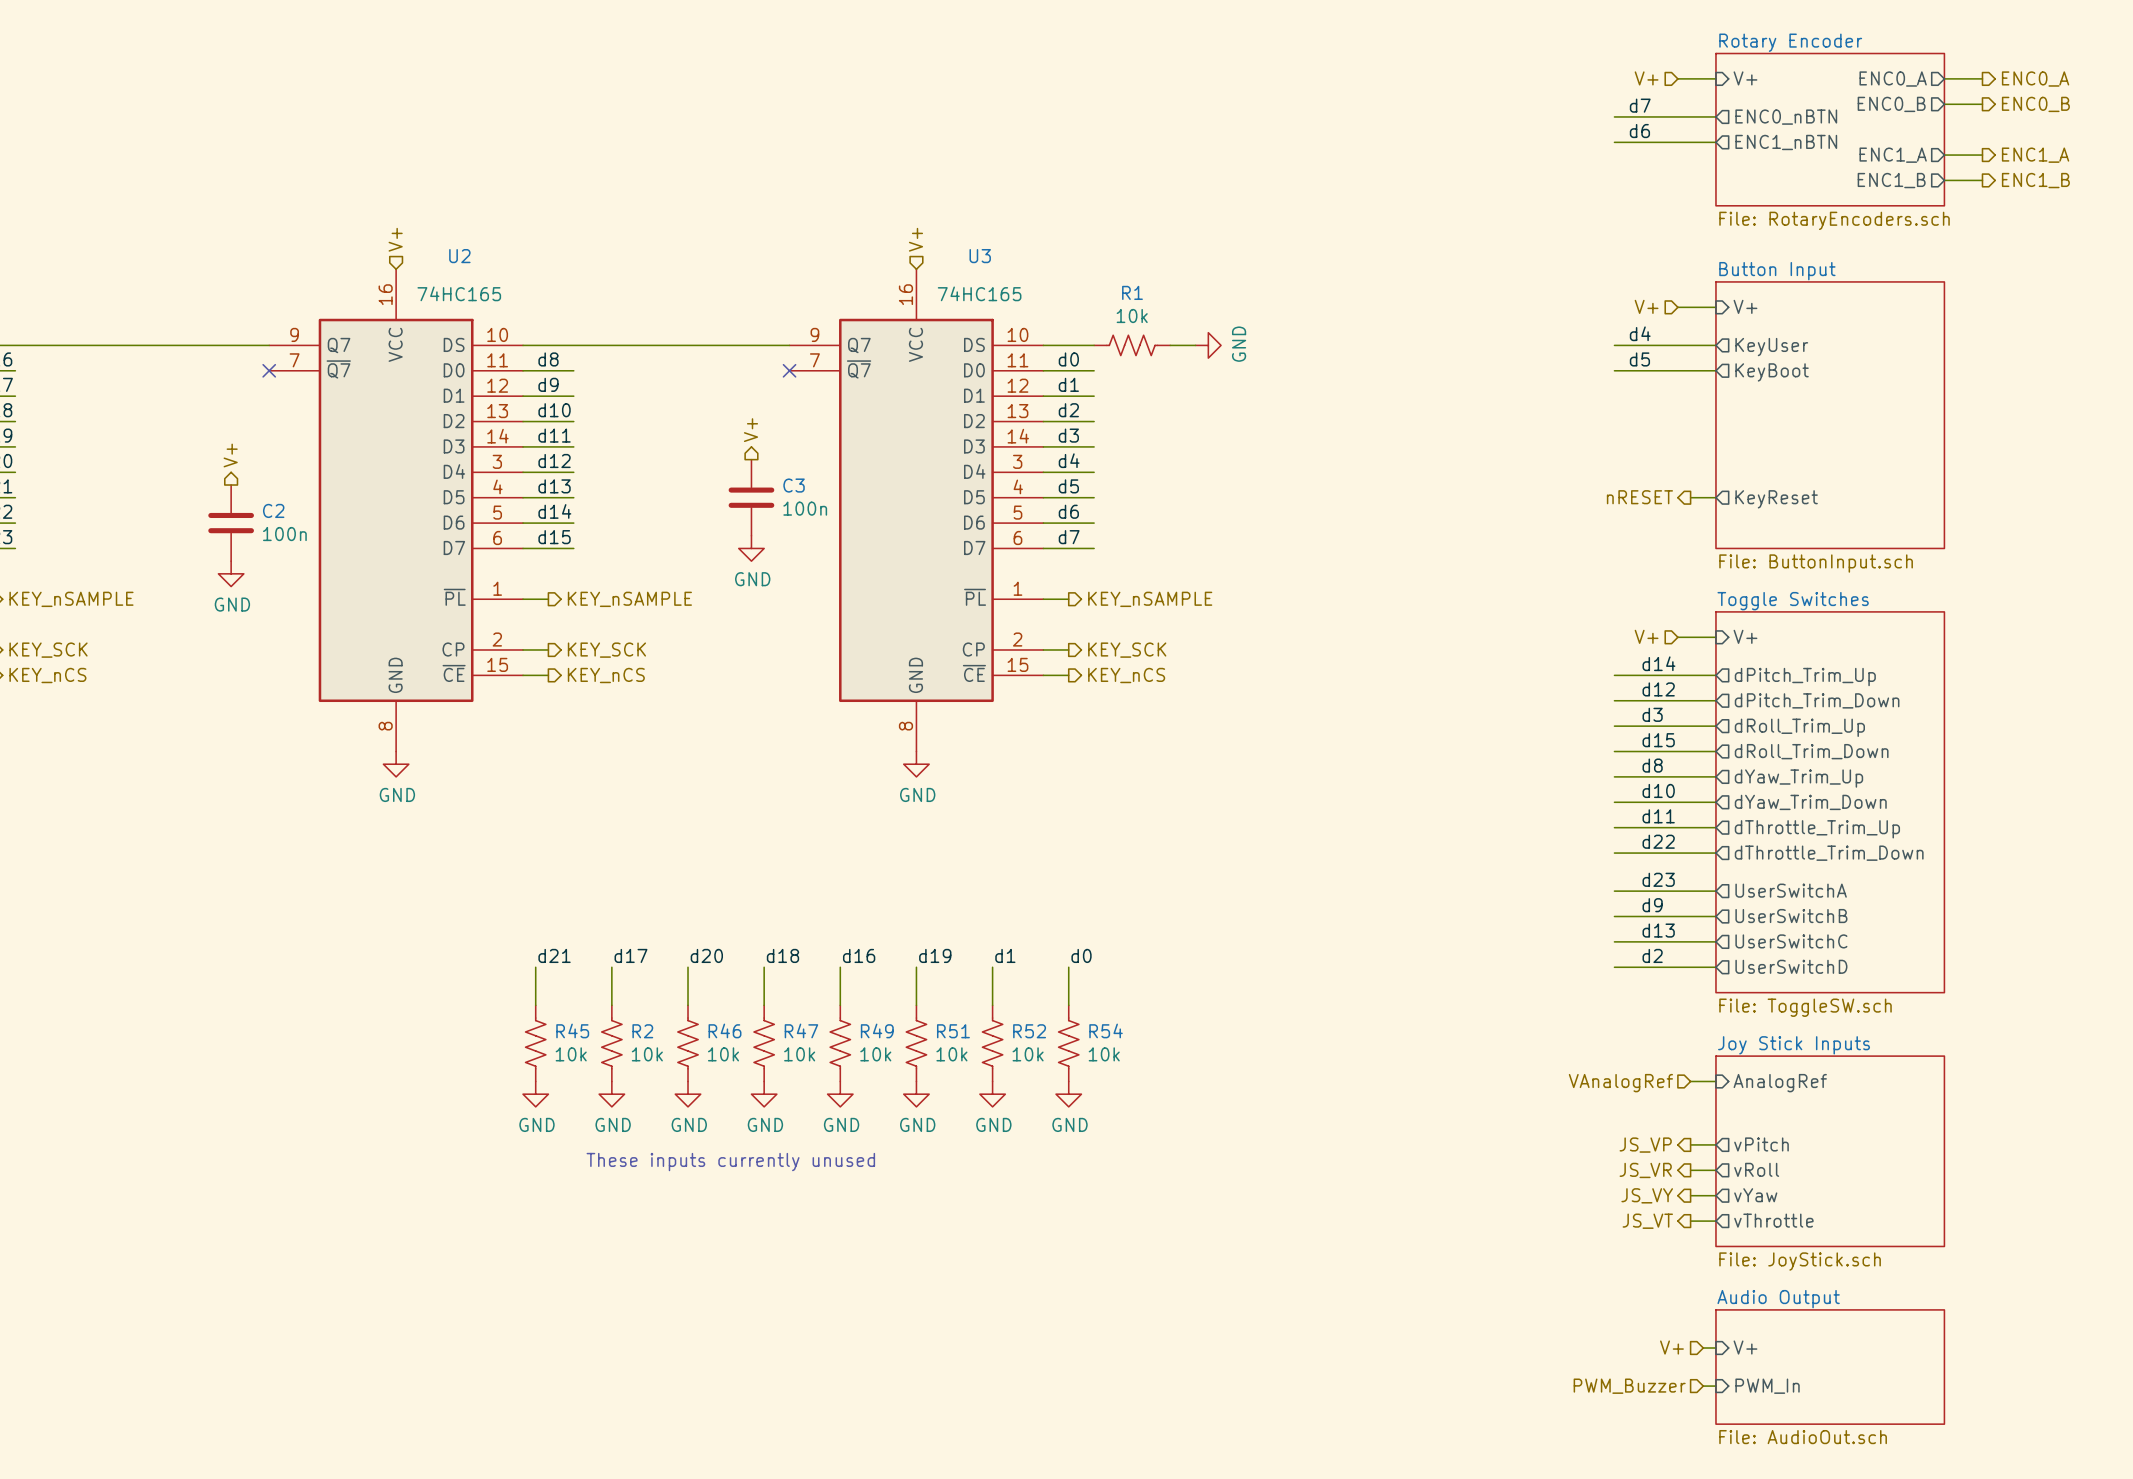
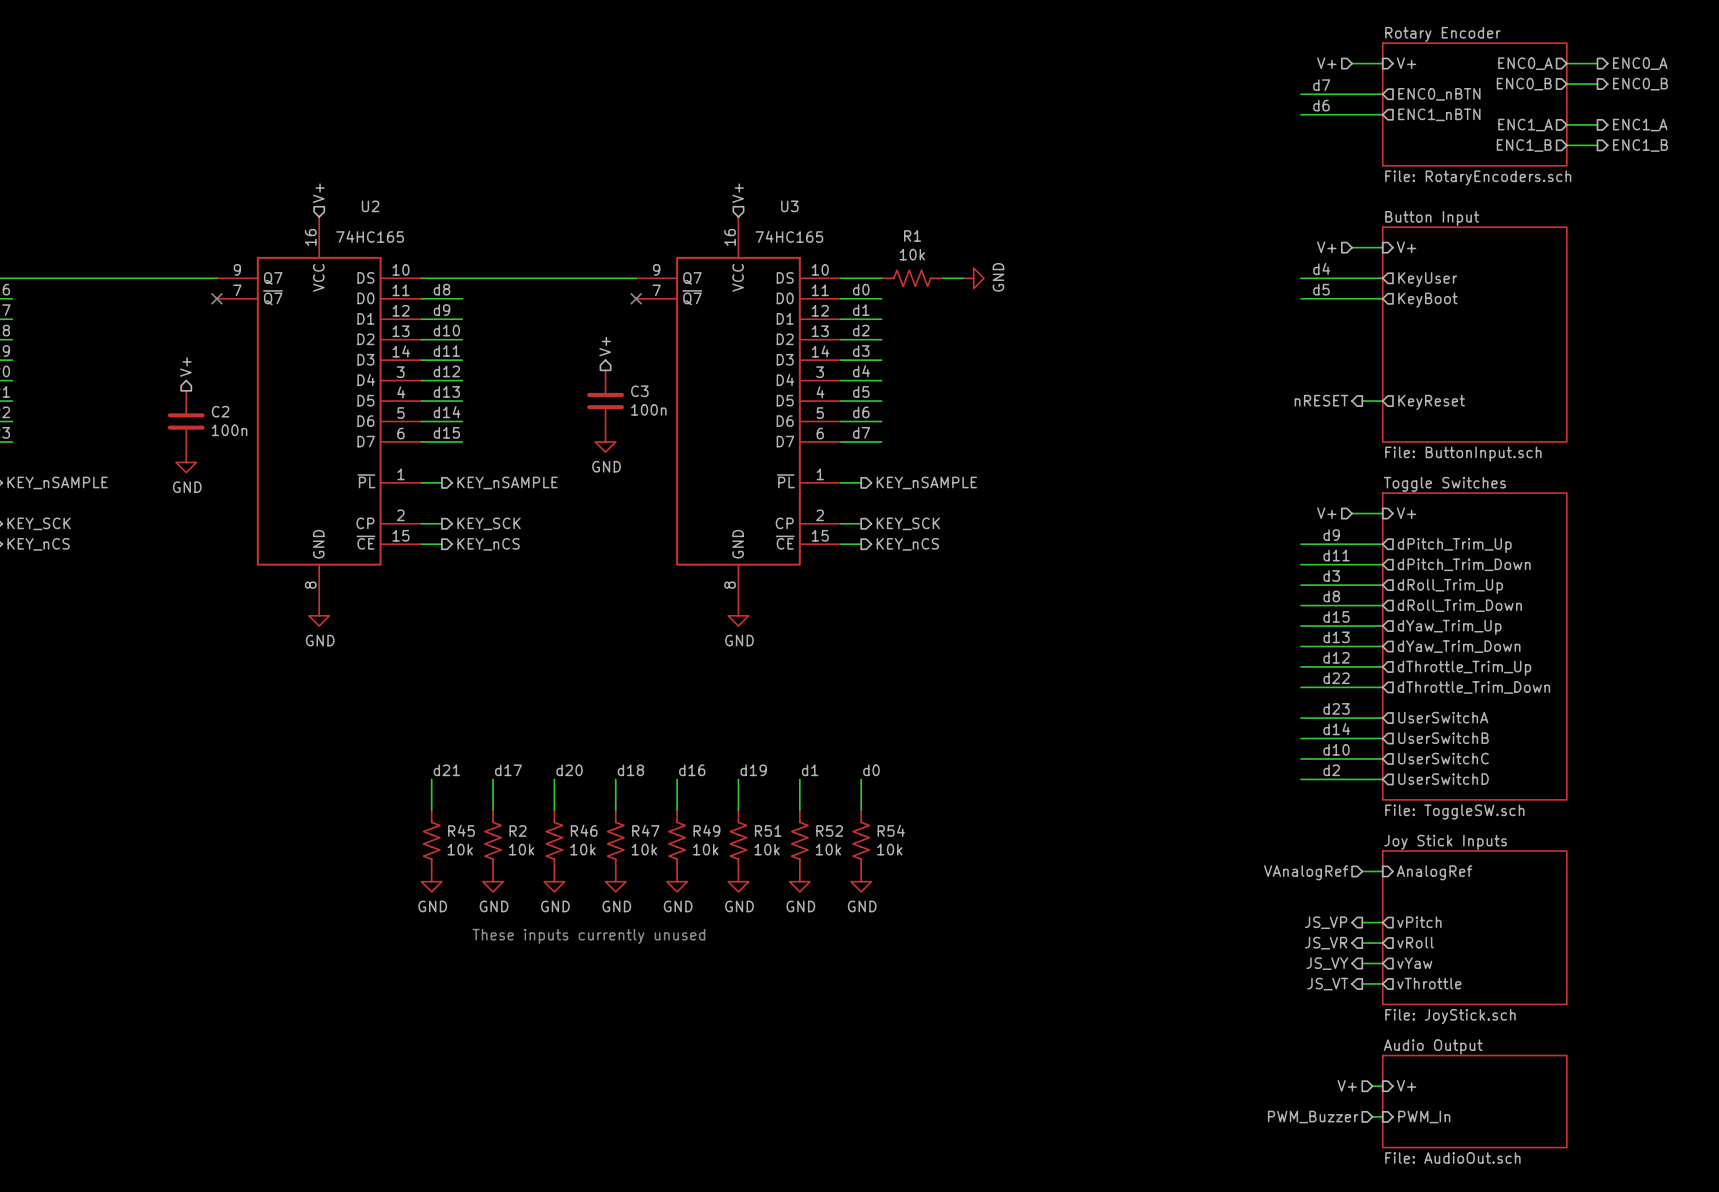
label: d14 (1658, 663) -> d9 (1331, 535)
label: d12 (1658, 689) -> d11 (1336, 555)
label: d15 (1658, 740) -> d8 (1331, 596)
label: d8 (1652, 765) -> d15 (1336, 616)
label: d10 (1658, 790) -> d13 (1336, 637)
label: d11 (1658, 816) -> d12 (1336, 657)
label: d9 (1652, 905) -> d14 (1336, 729)
label: d13 (1658, 930) -> d10 (1336, 749)

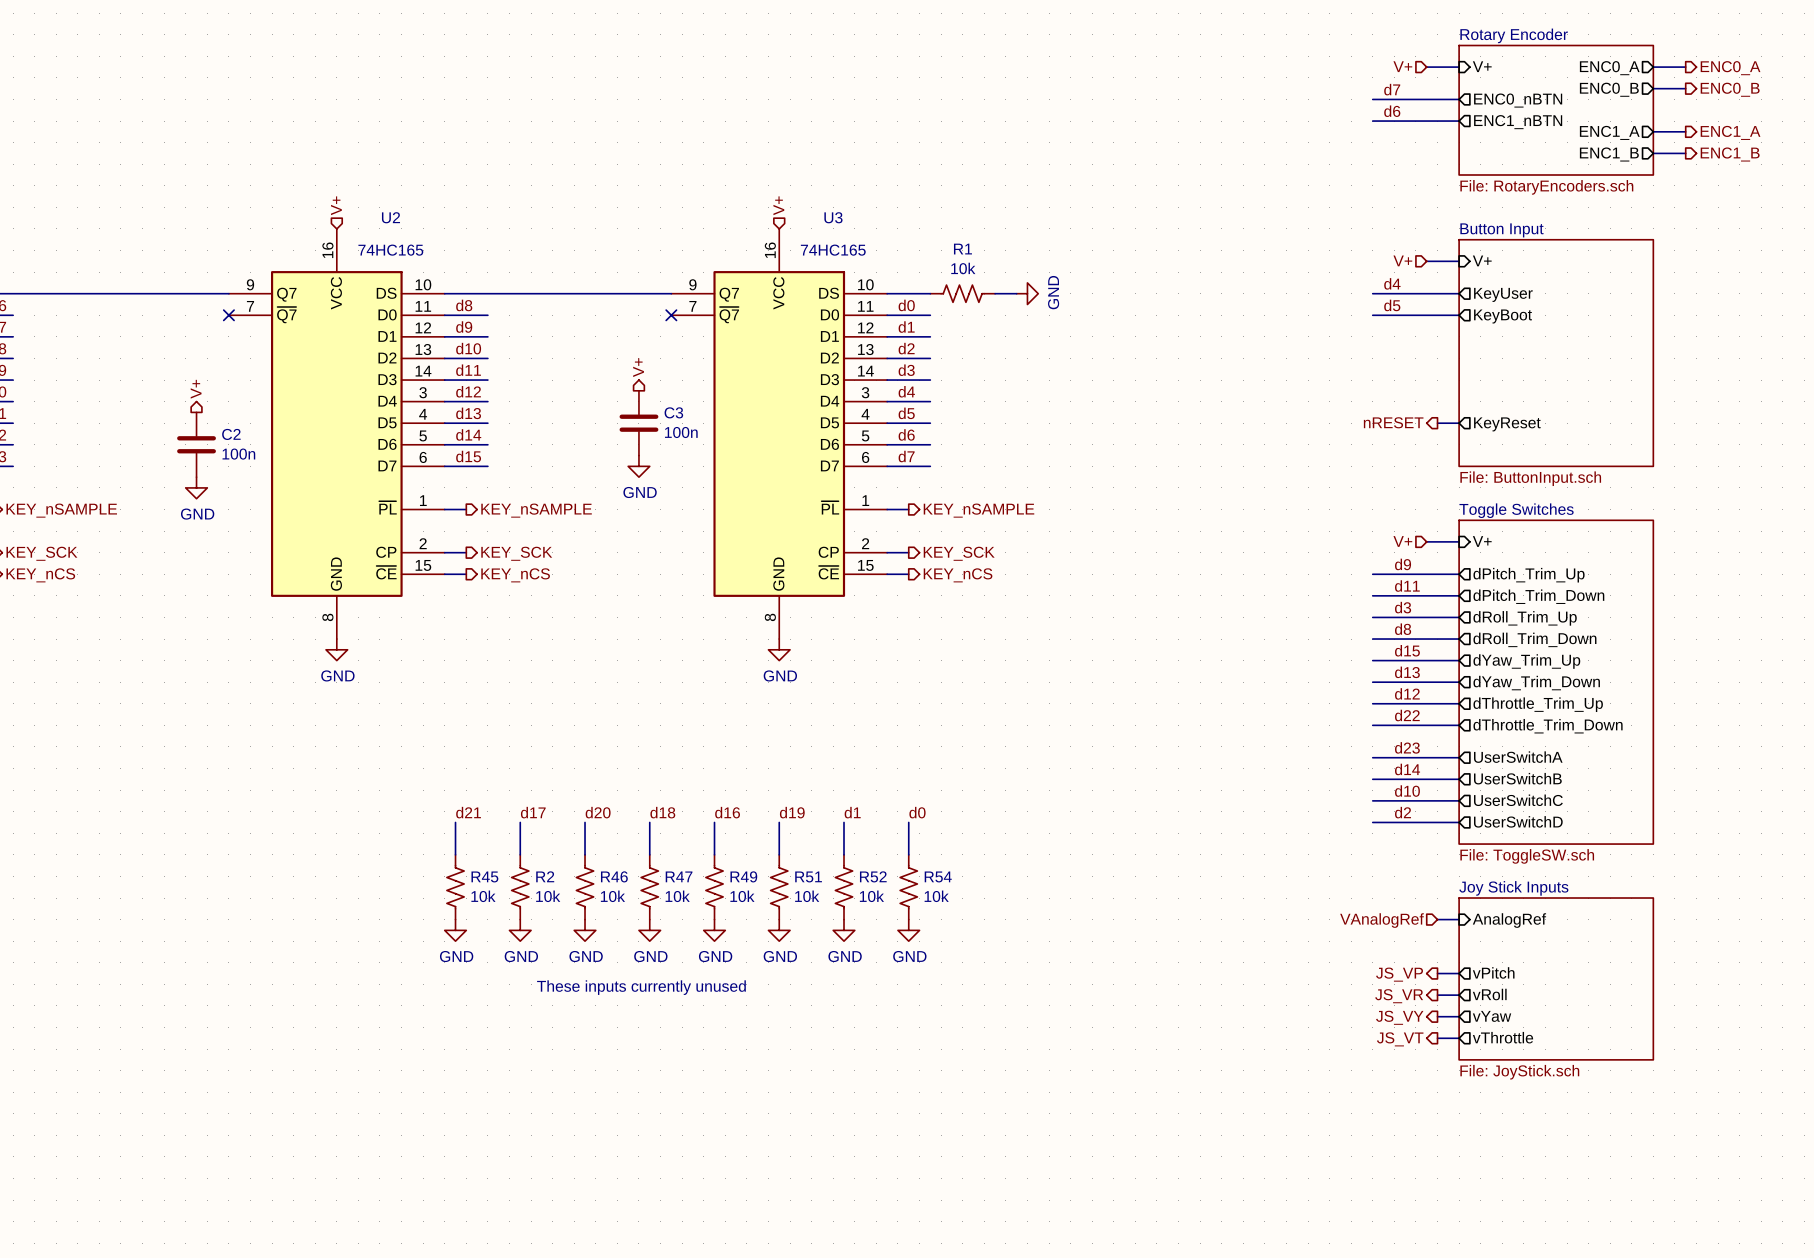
hierarchical label: V+ (1347, 1085) -> none
sheet pin: V+ (1406, 1085) -> none
wire: (1372, 1086) (1382, 1086) -> none
sheet Audio Output: File: AudioOut.sch (1474, 1101) -> none
wire: (1372, 1116) (1382, 1116) -> none
hierarchical label: PWM_Buzzer (1313, 1117) -> none
sheet pin: PWM_In (1424, 1117) -> none

